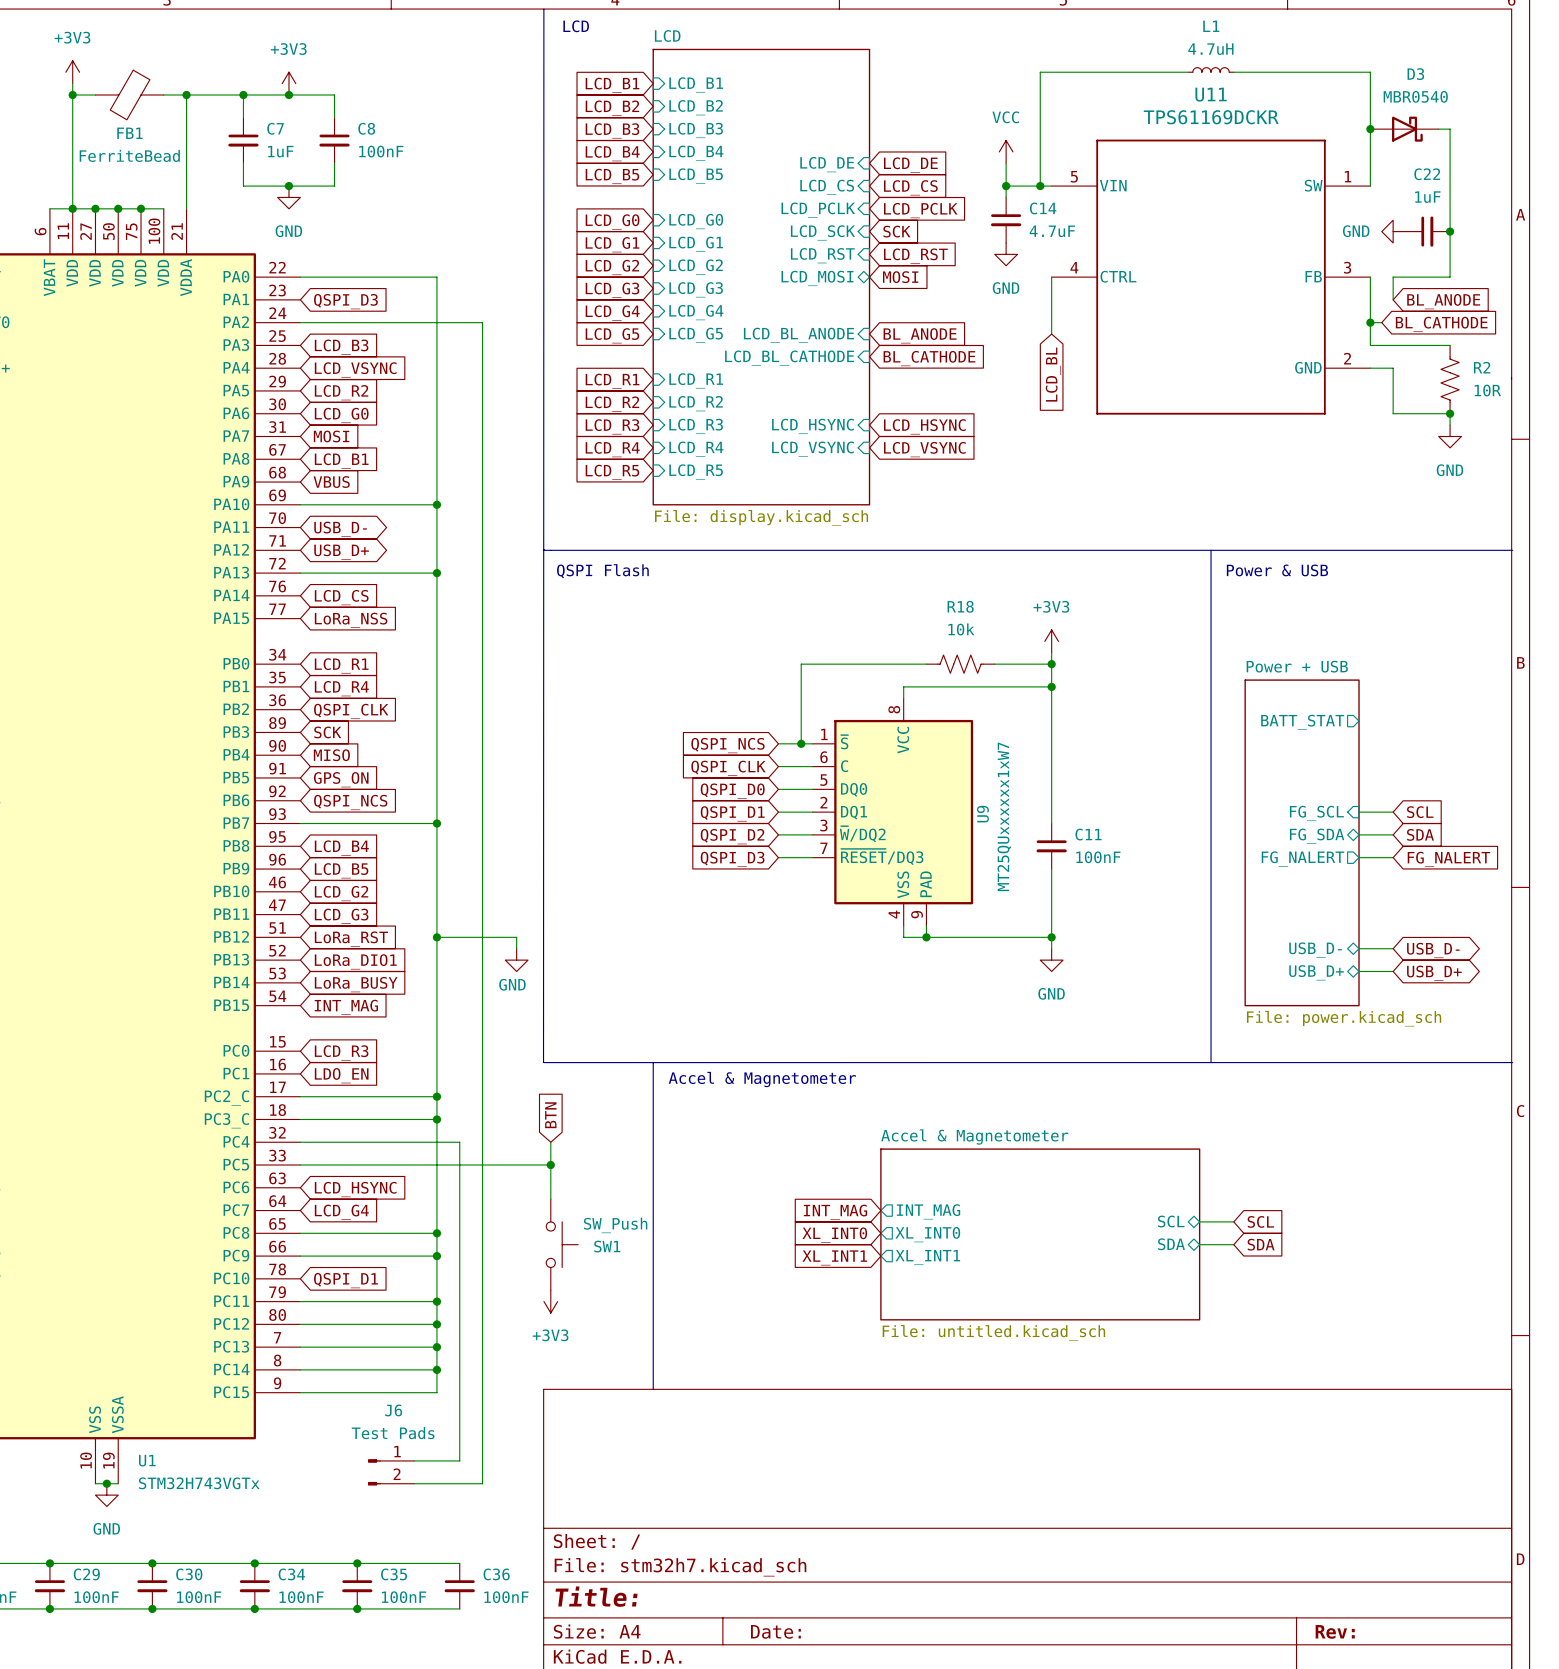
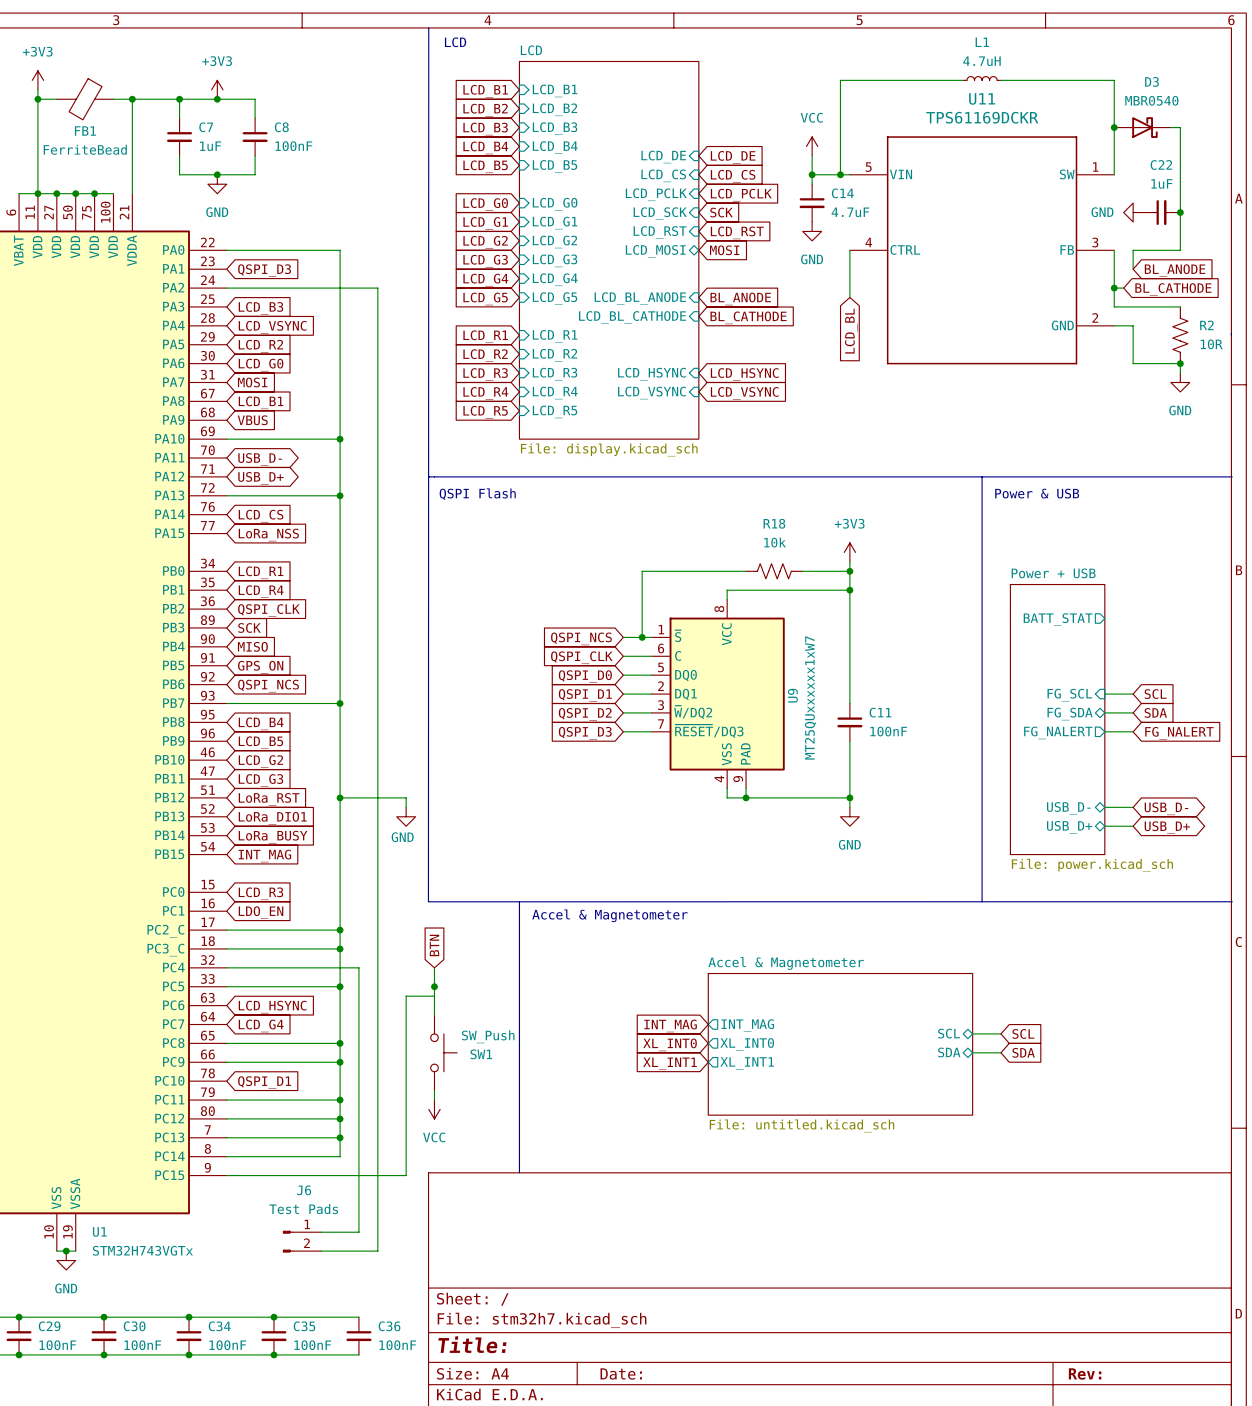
wire: (436, 1165) (550, 1165) -> none
junction: none -> (340, 986)
power symbol: +3V3 (550, 1301) -> none
power symbol: none -> VCC (434, 1109)
wire: (436, 1369) (436, 1392) -> (434, 996) (406, 996) (406, 1175) (340, 1175)
junction: (436, 1369) -> none

